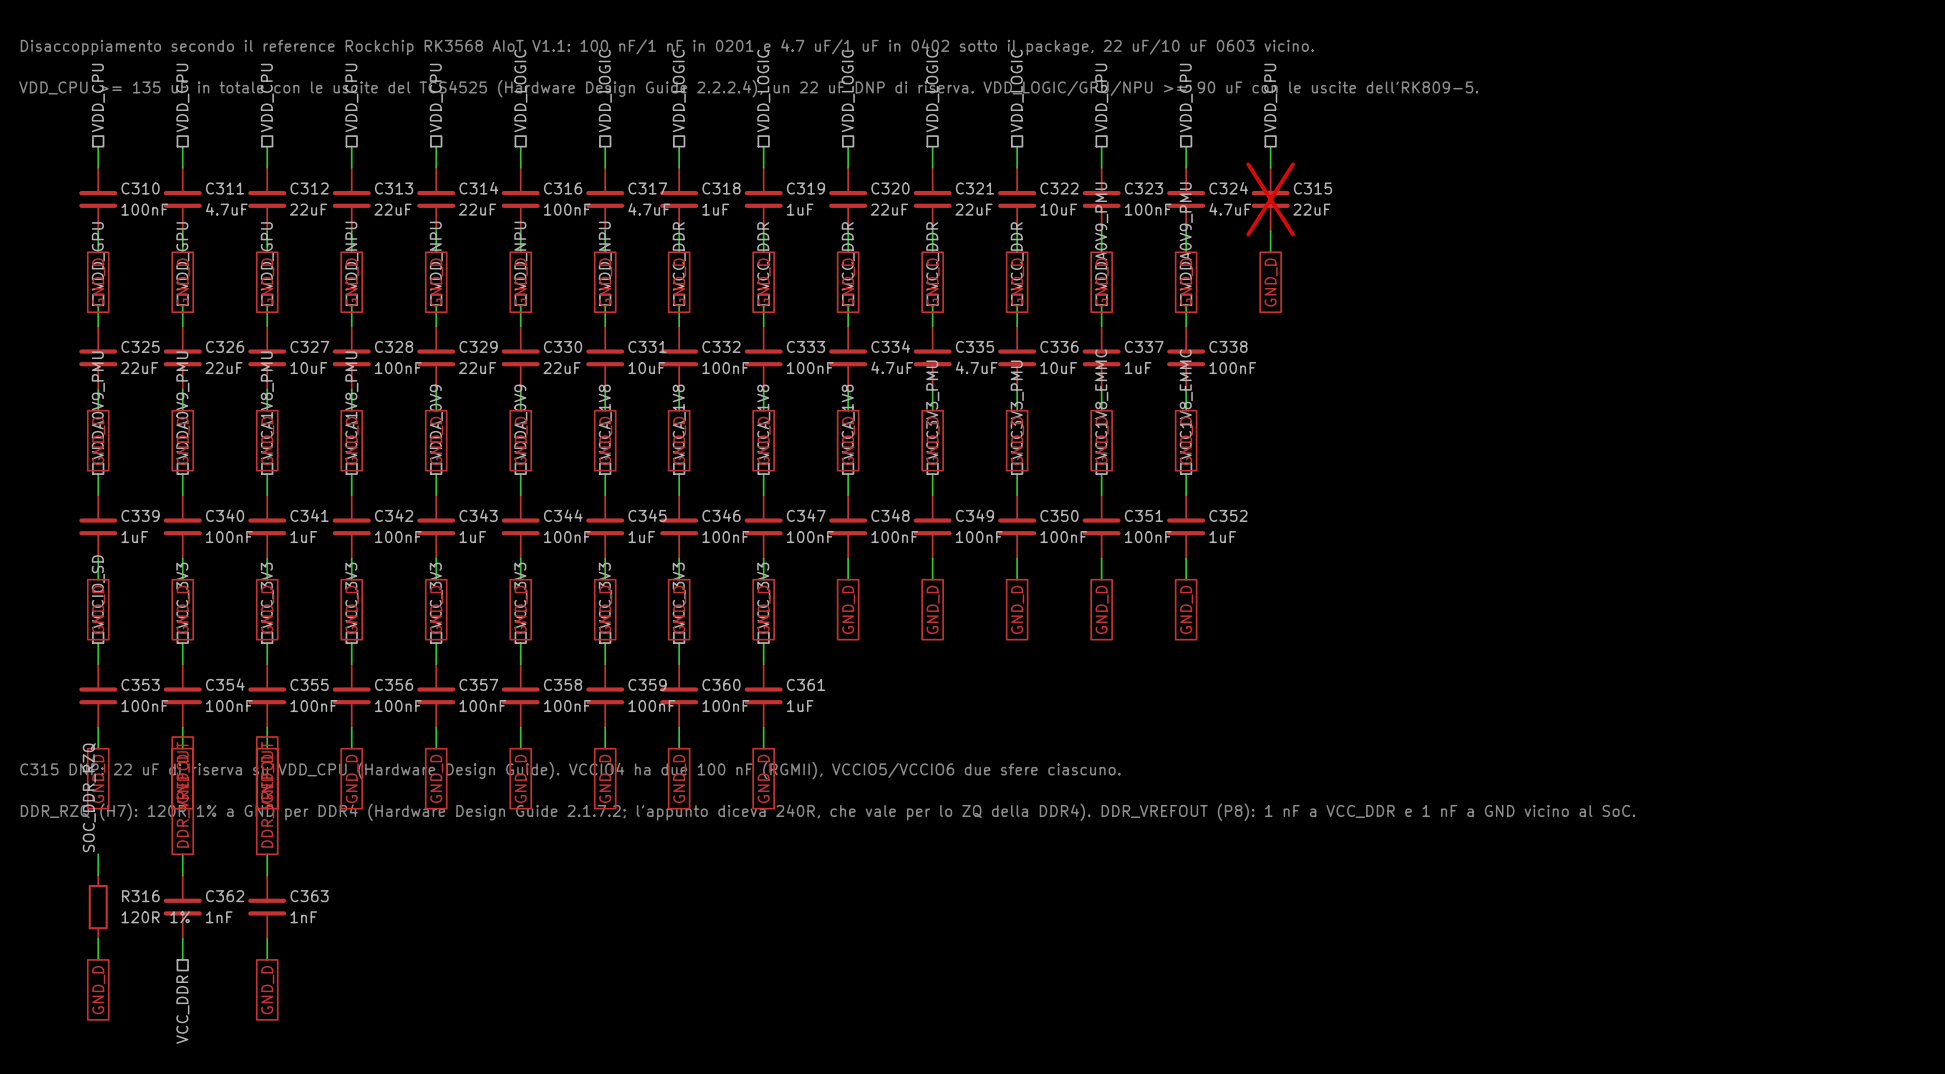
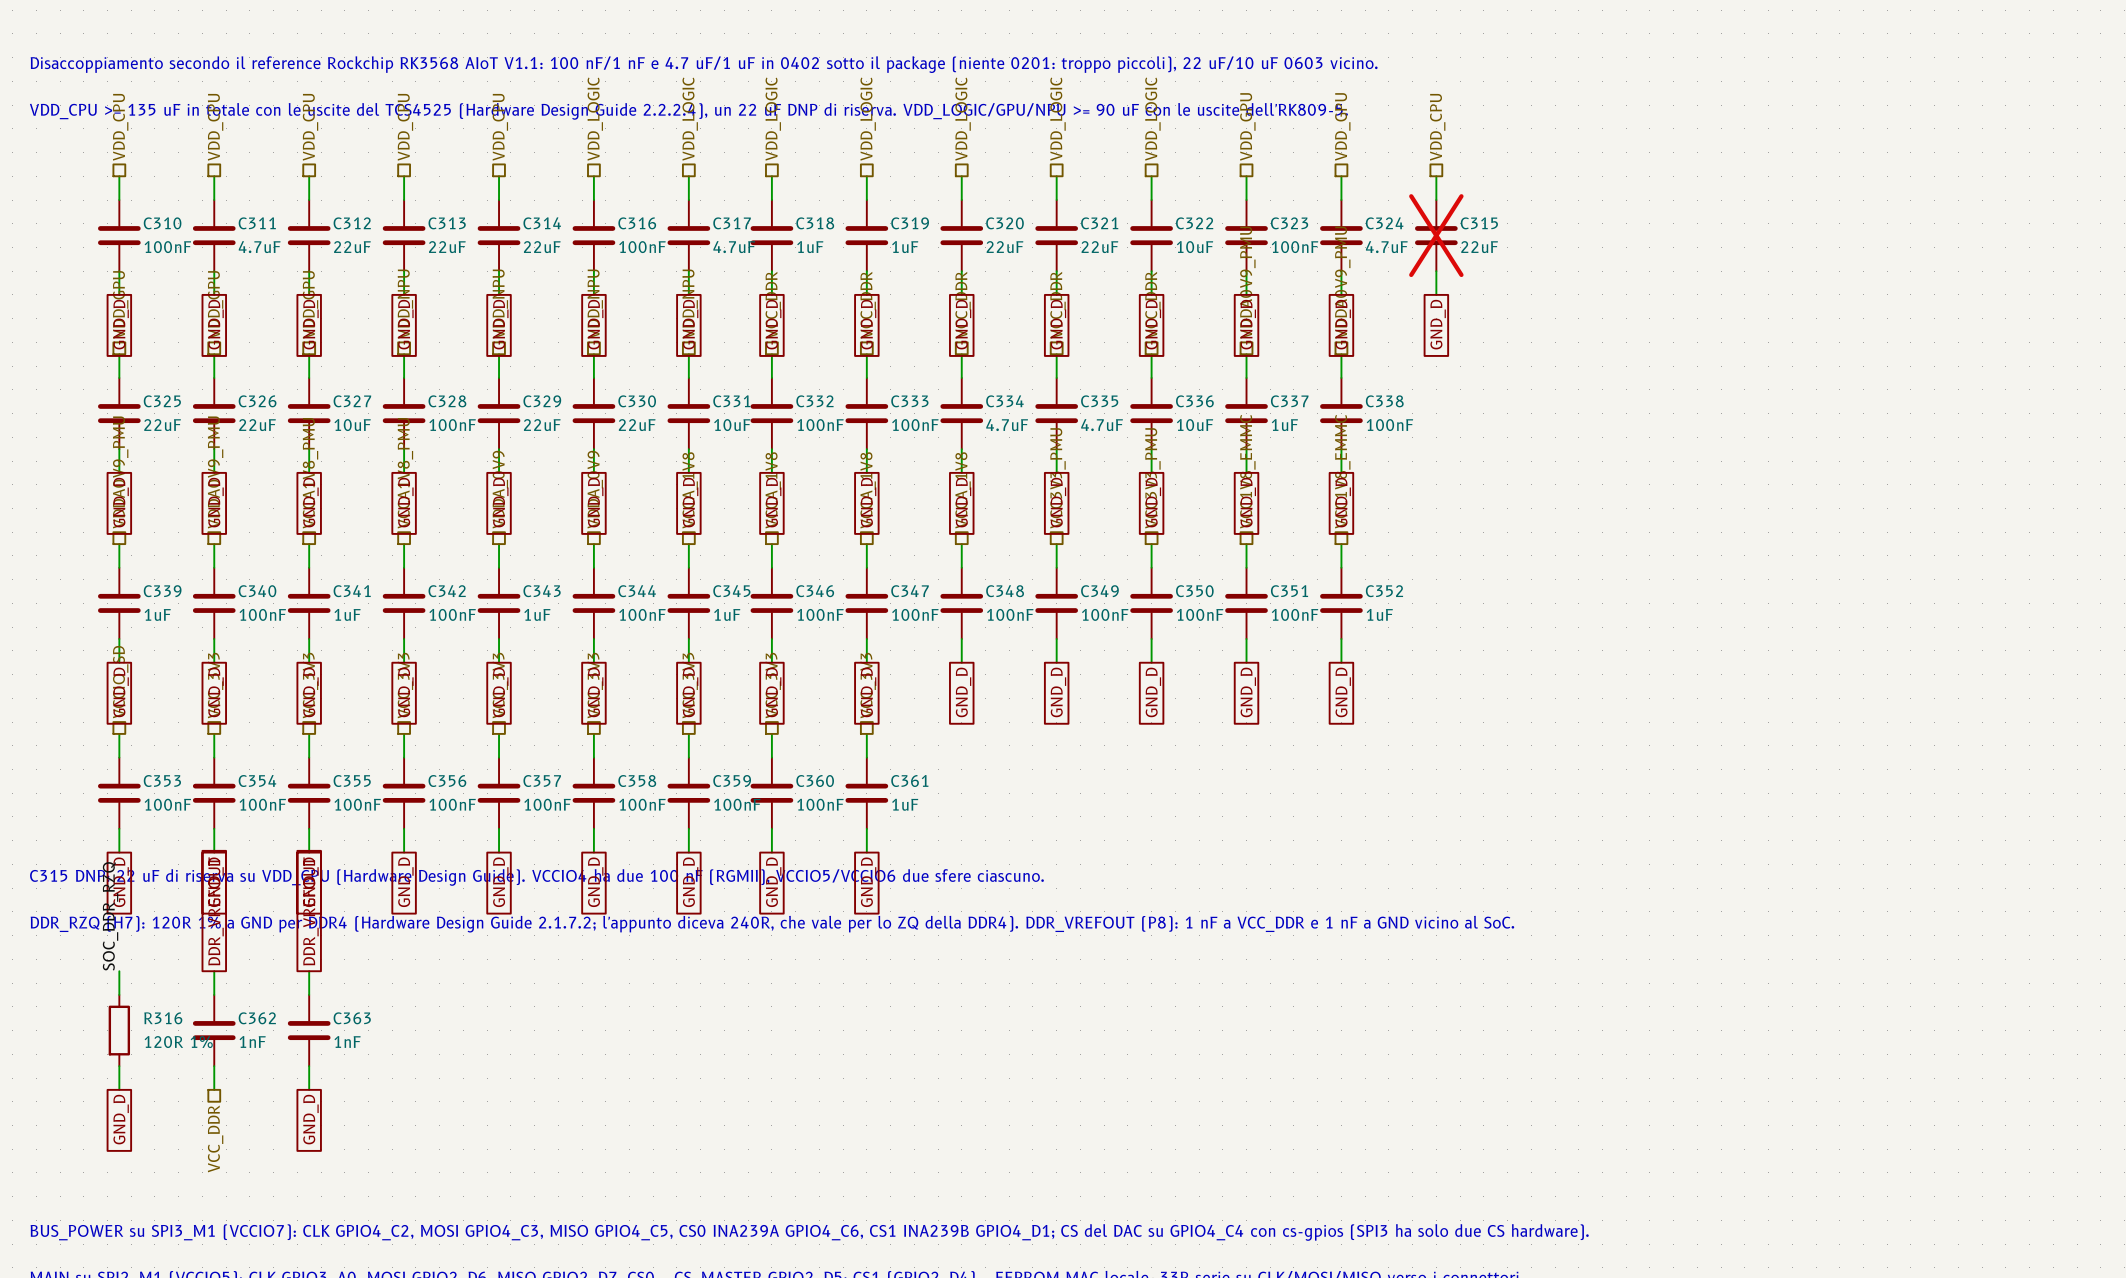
text: Disaccoppiamento secondo il reference Rockchip RK3568 AIoT V1.1: 100 nF/1 nF in 0201 e 4.7 uF/1 uF in 0402 sotto il package, 22 uF/10 uF 0603 vicino. (667, 47) -> Disaccoppiamento secondo il reference Rockchip RK3568 AIoT V1.1: 100 nF/1 nF e 4.7 uF/1 uF in 0402 sotto il package (niente 0201: troppo piccoli), 22 uF/10 uF 0603 vicino. (704, 64)

